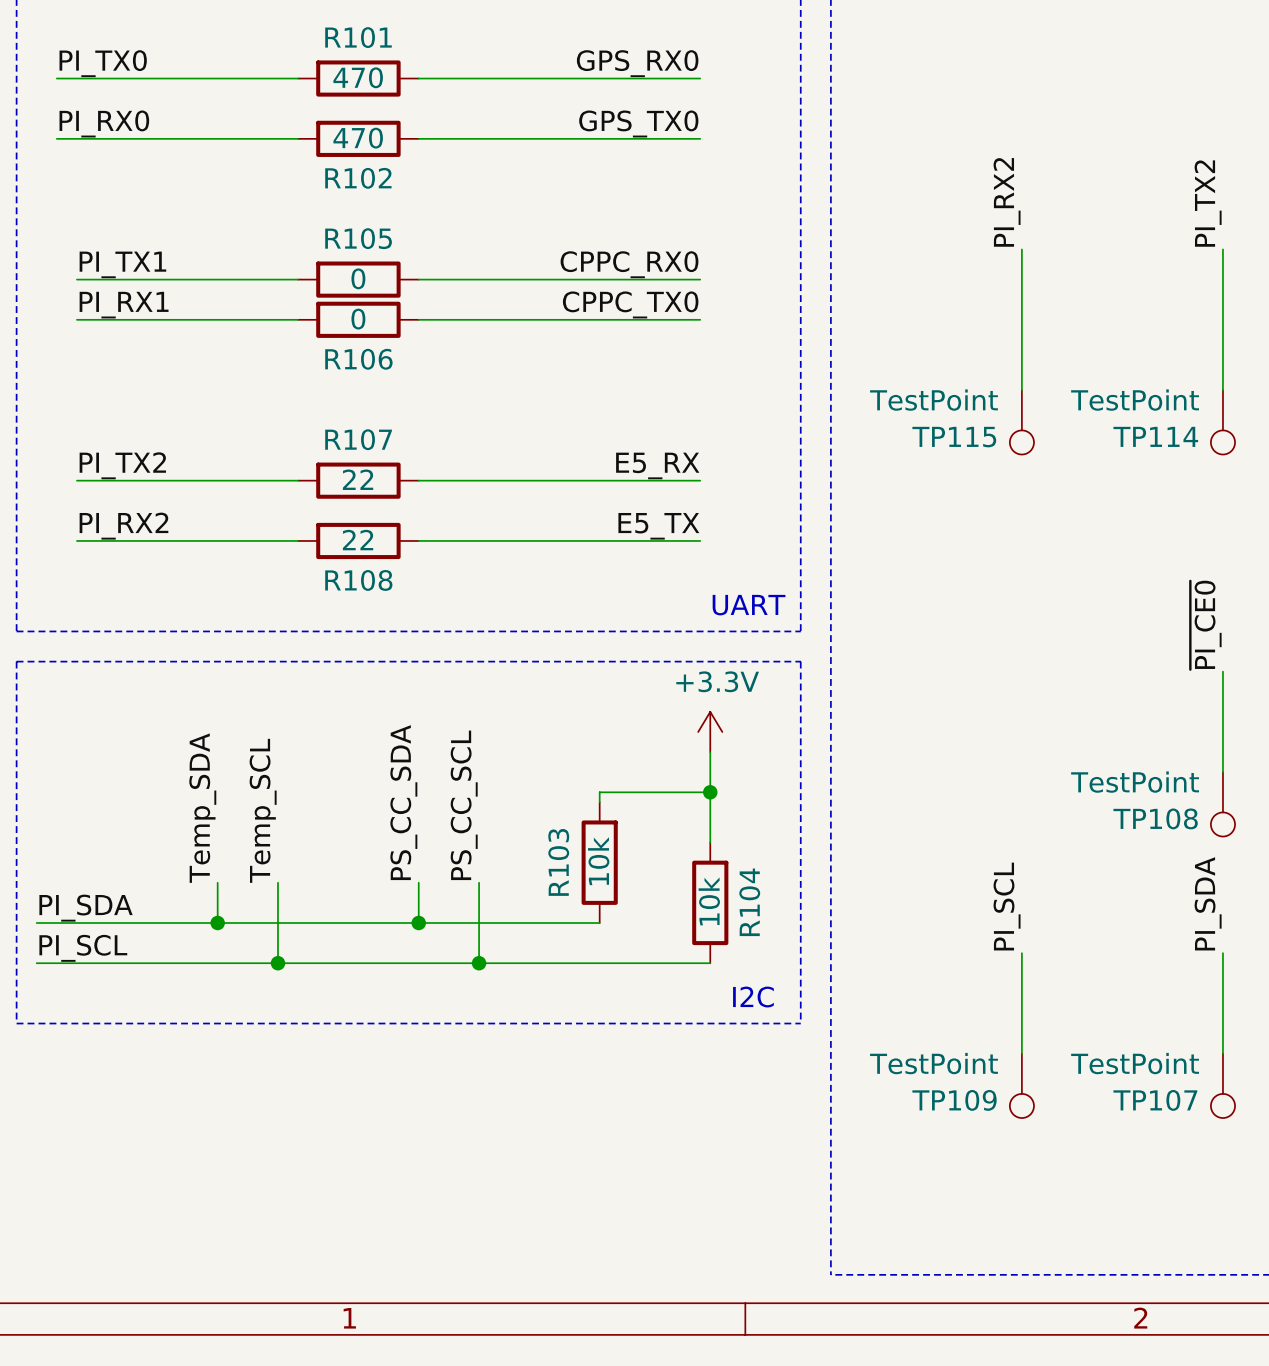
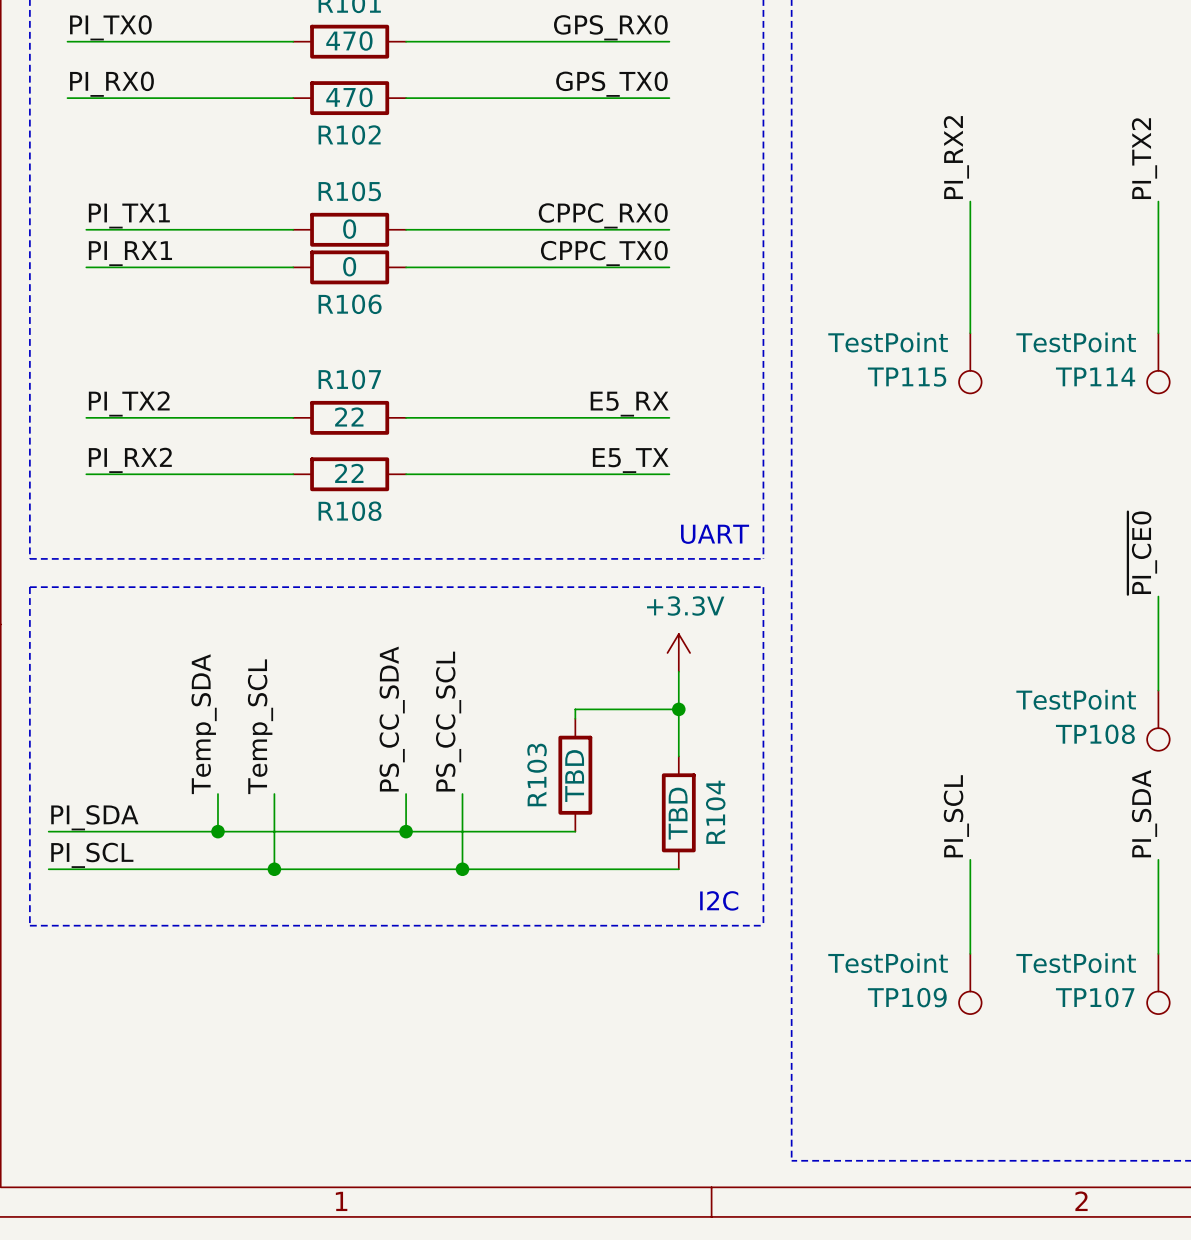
R103 value: 10k (598, 861) -> TBD (574, 776)
R104 value: 10k (709, 901) -> TBD (678, 813)

